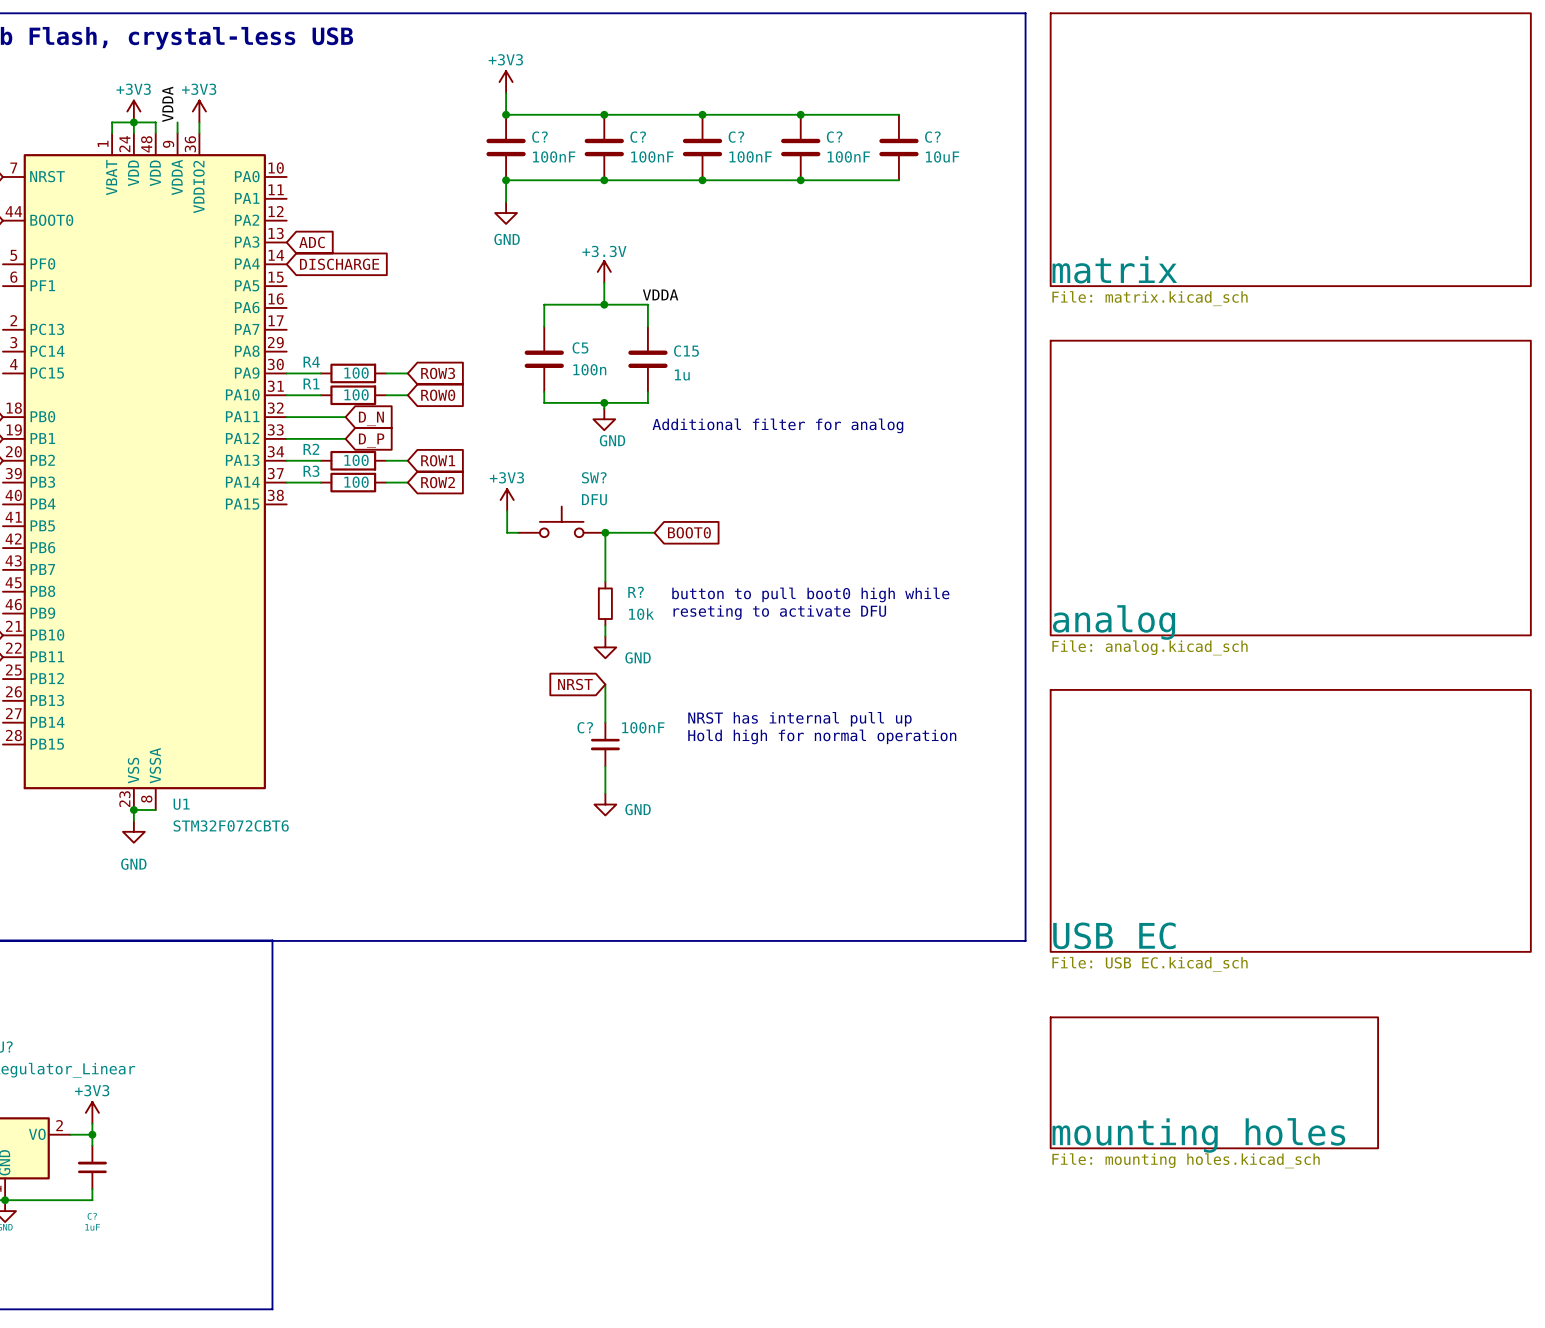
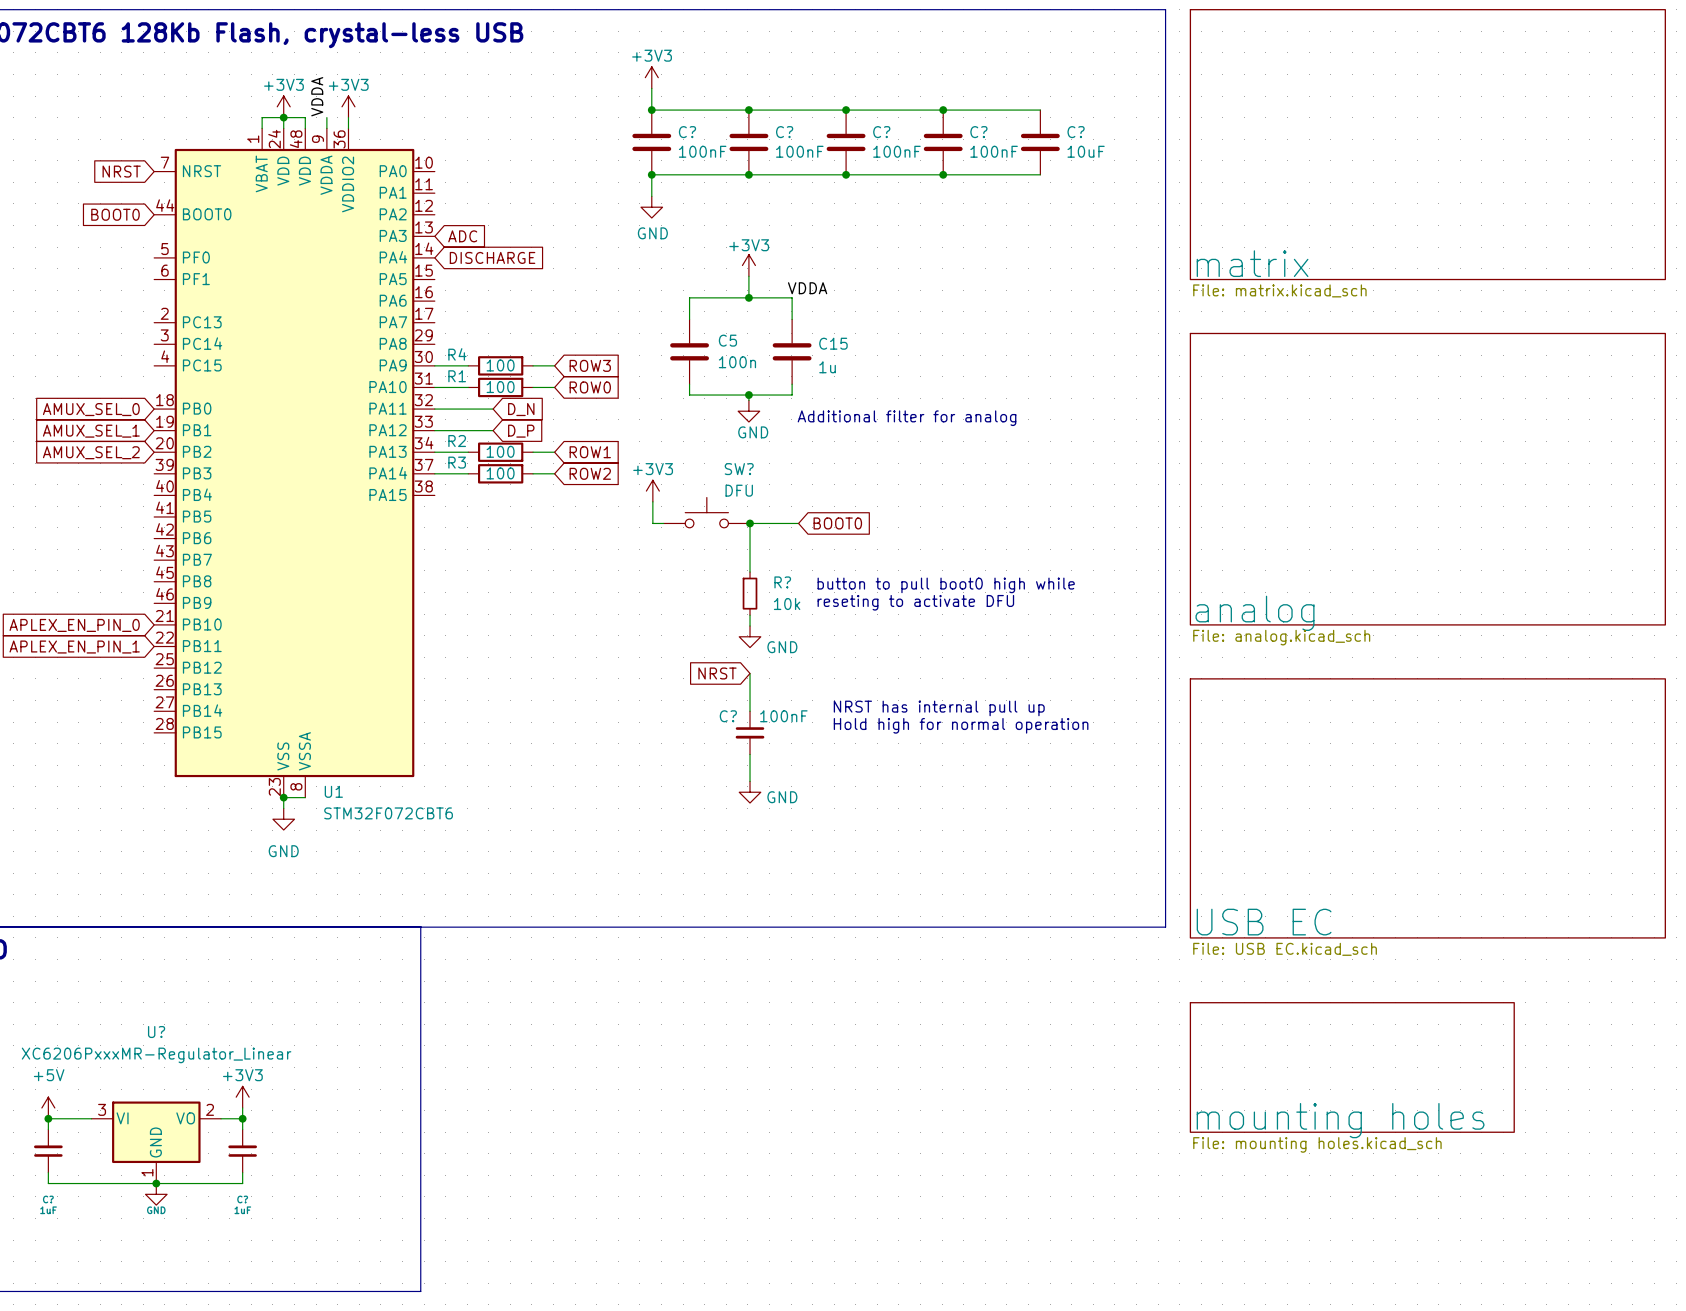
power symbol: +3.3V (604, 271) -> +3V3 (748, 265)

